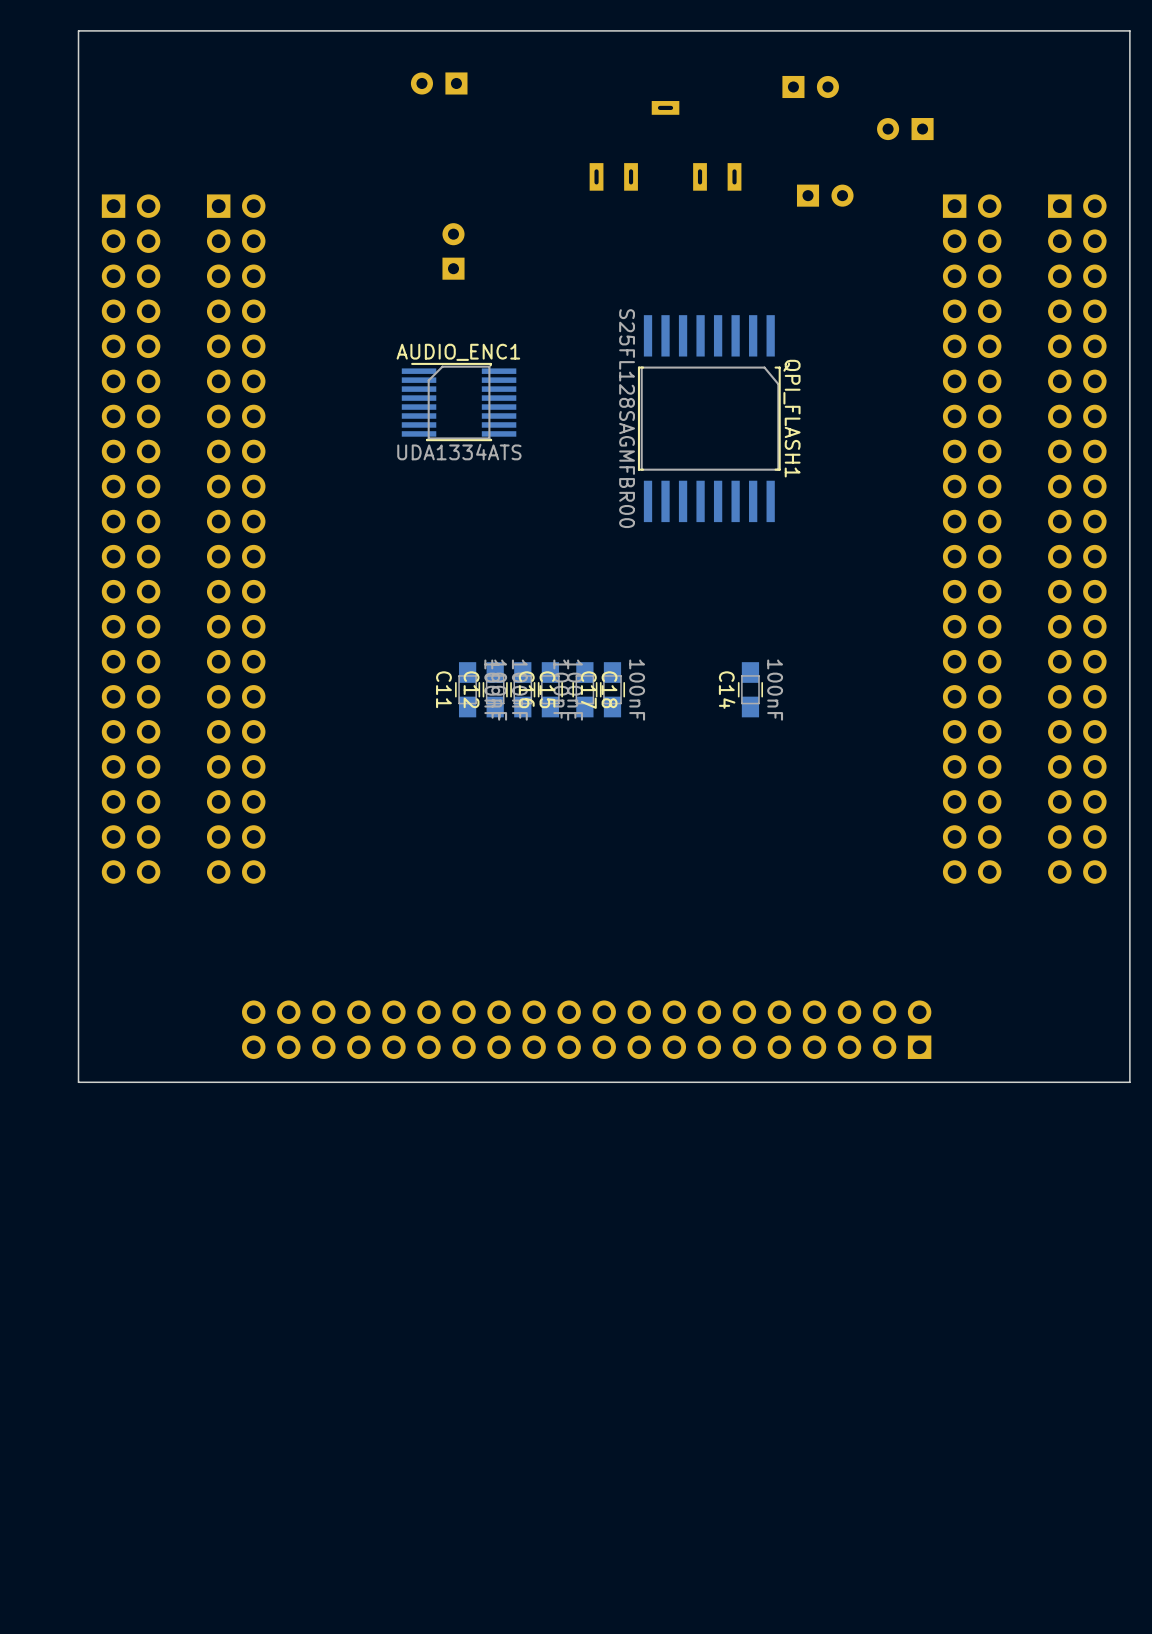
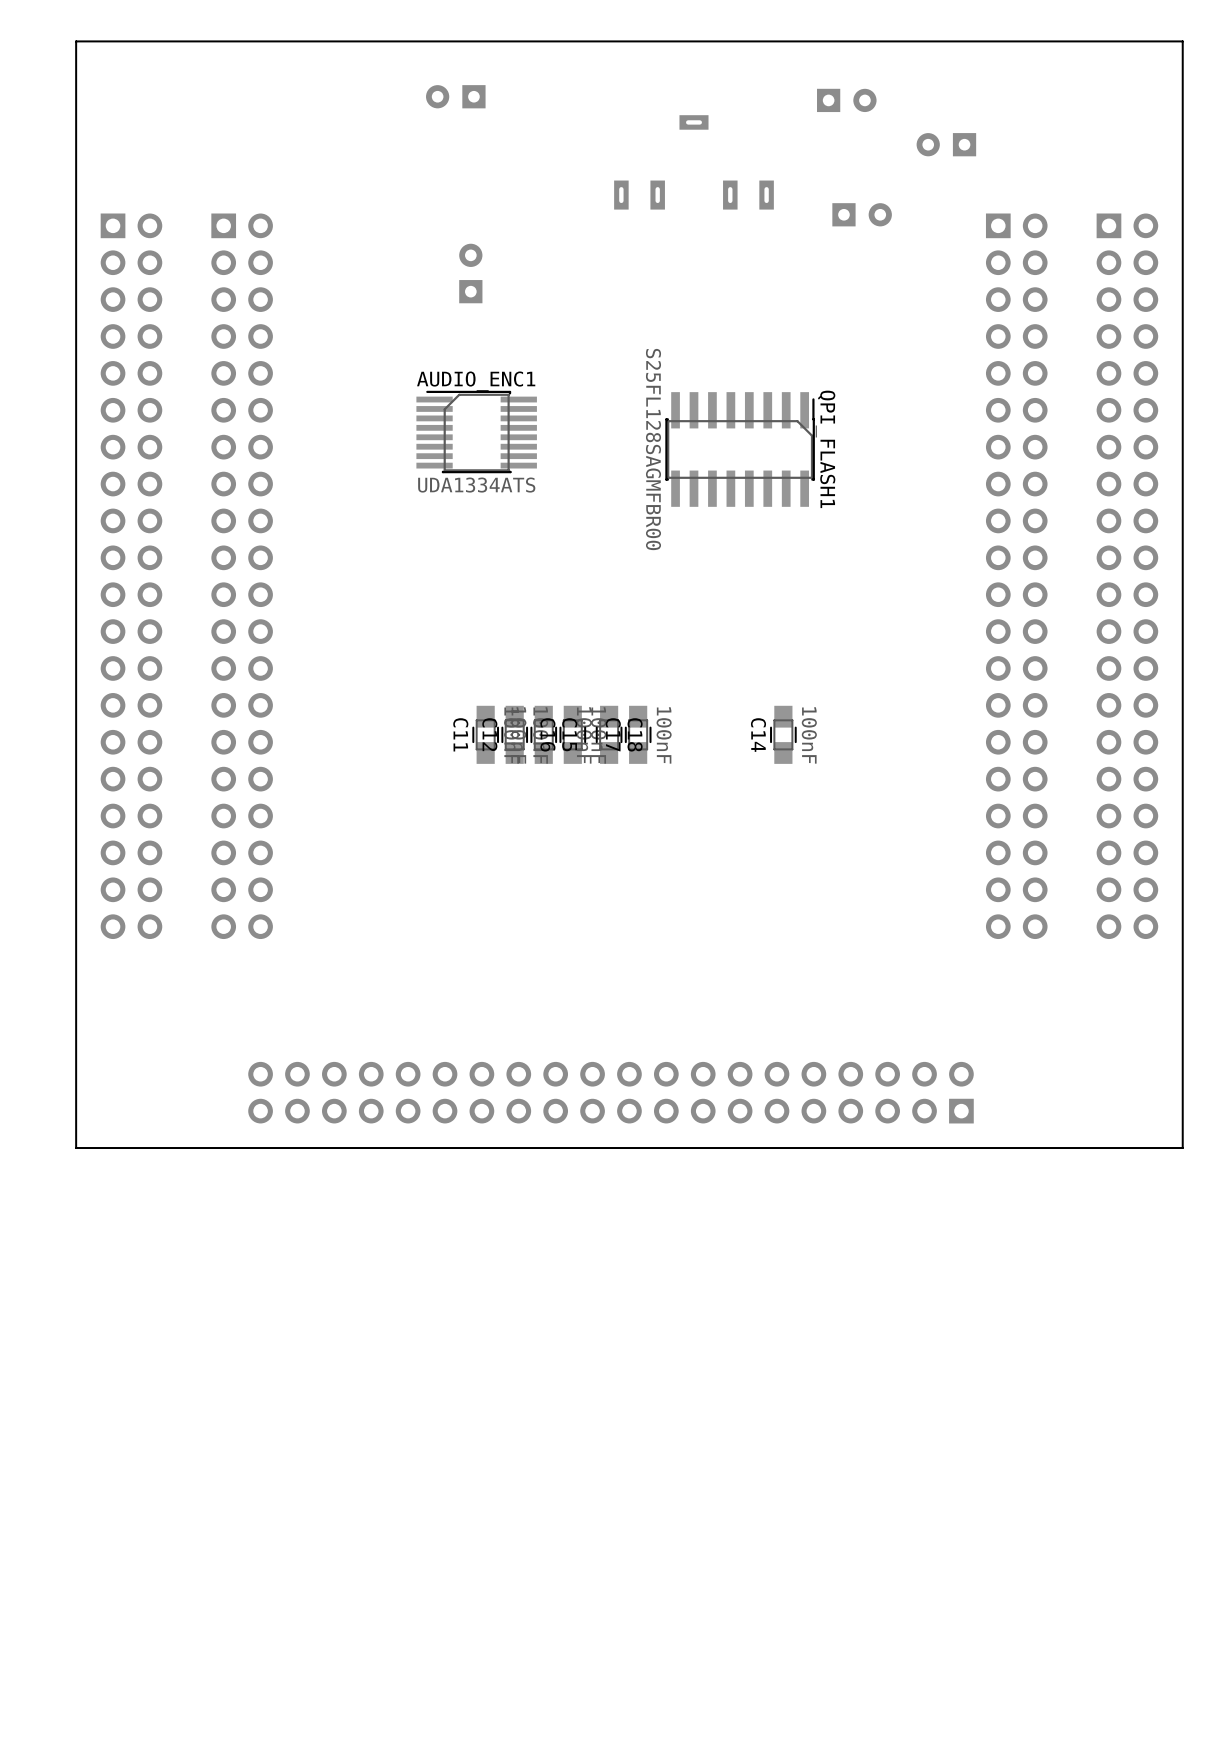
QPI_FLASH1 footprint: [637, 315, 781, 523] -> [665, 392, 815, 507]

